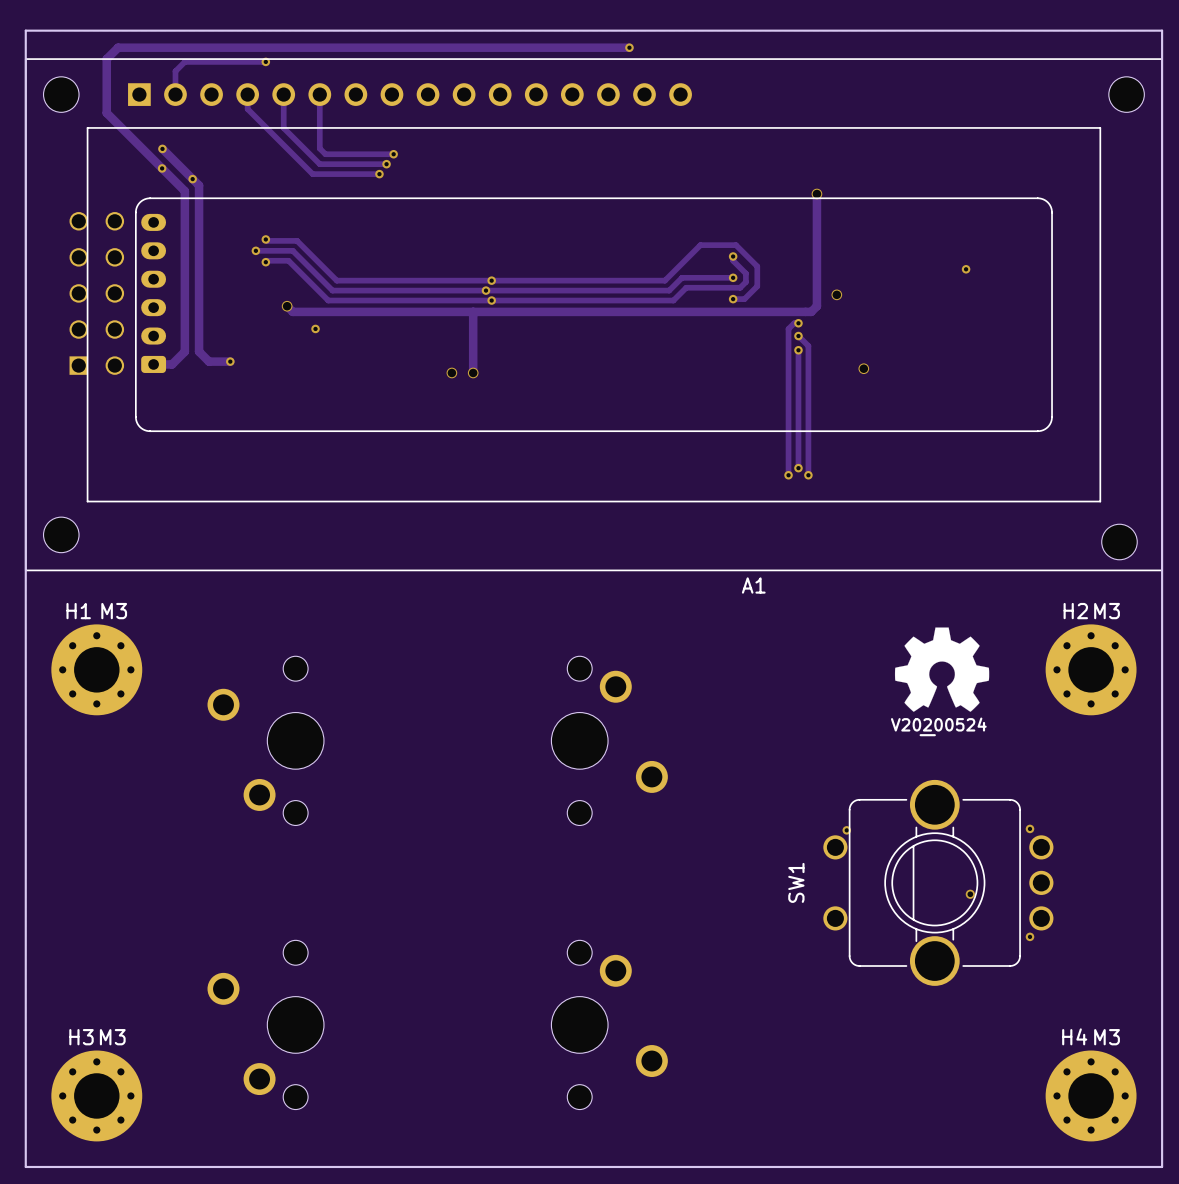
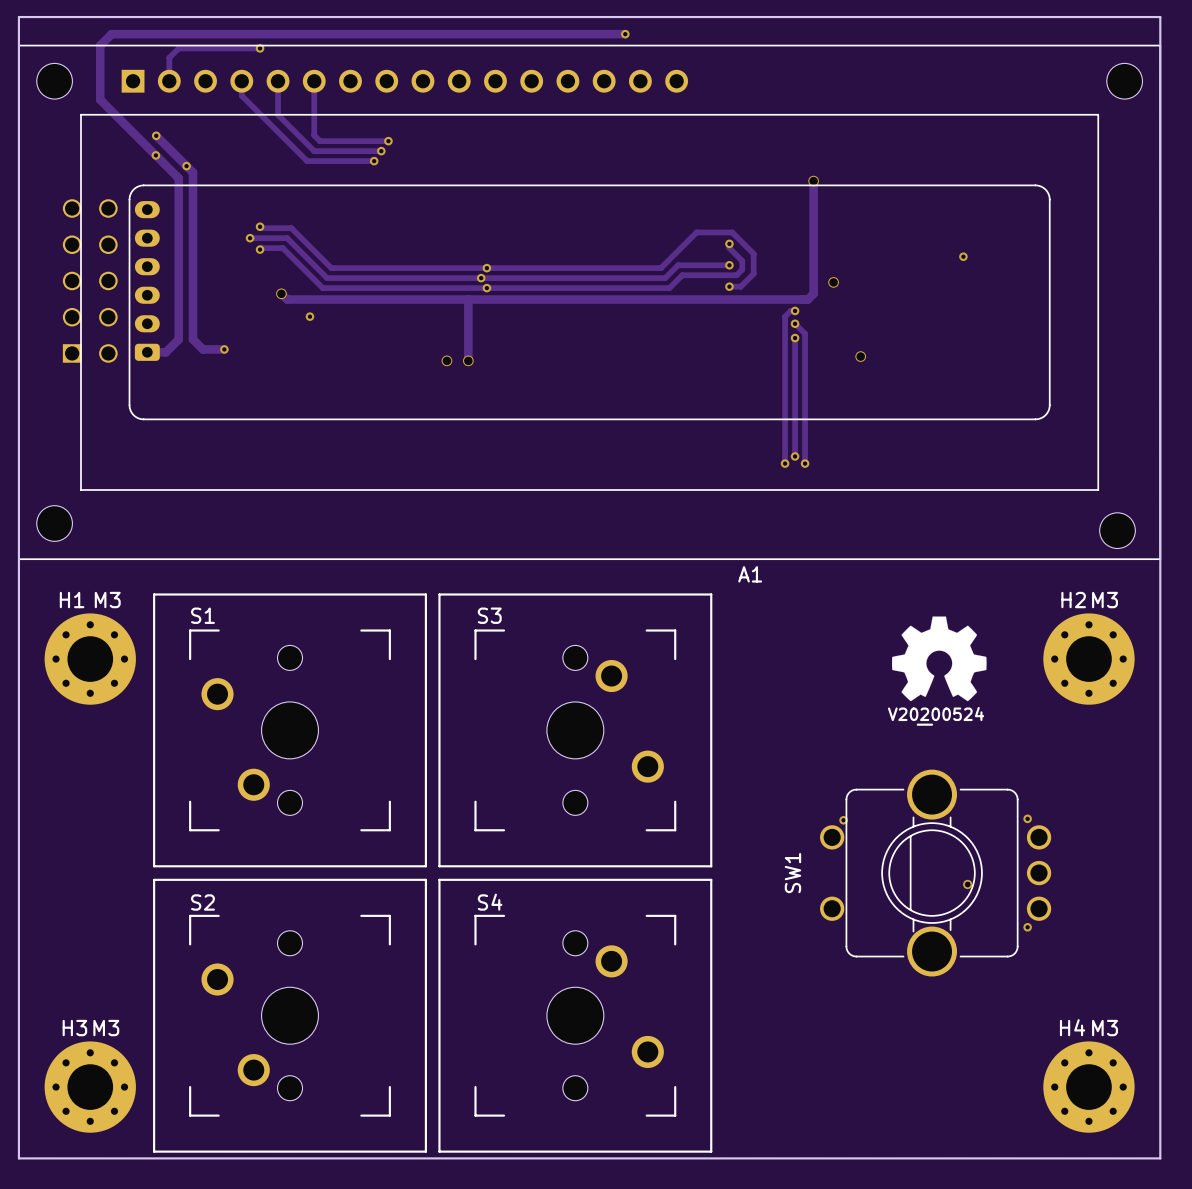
S1: none -> (290, 730)
S3: none -> (575, 730)
S2: none -> (290, 1015)
S4: none -> (575, 1015)

